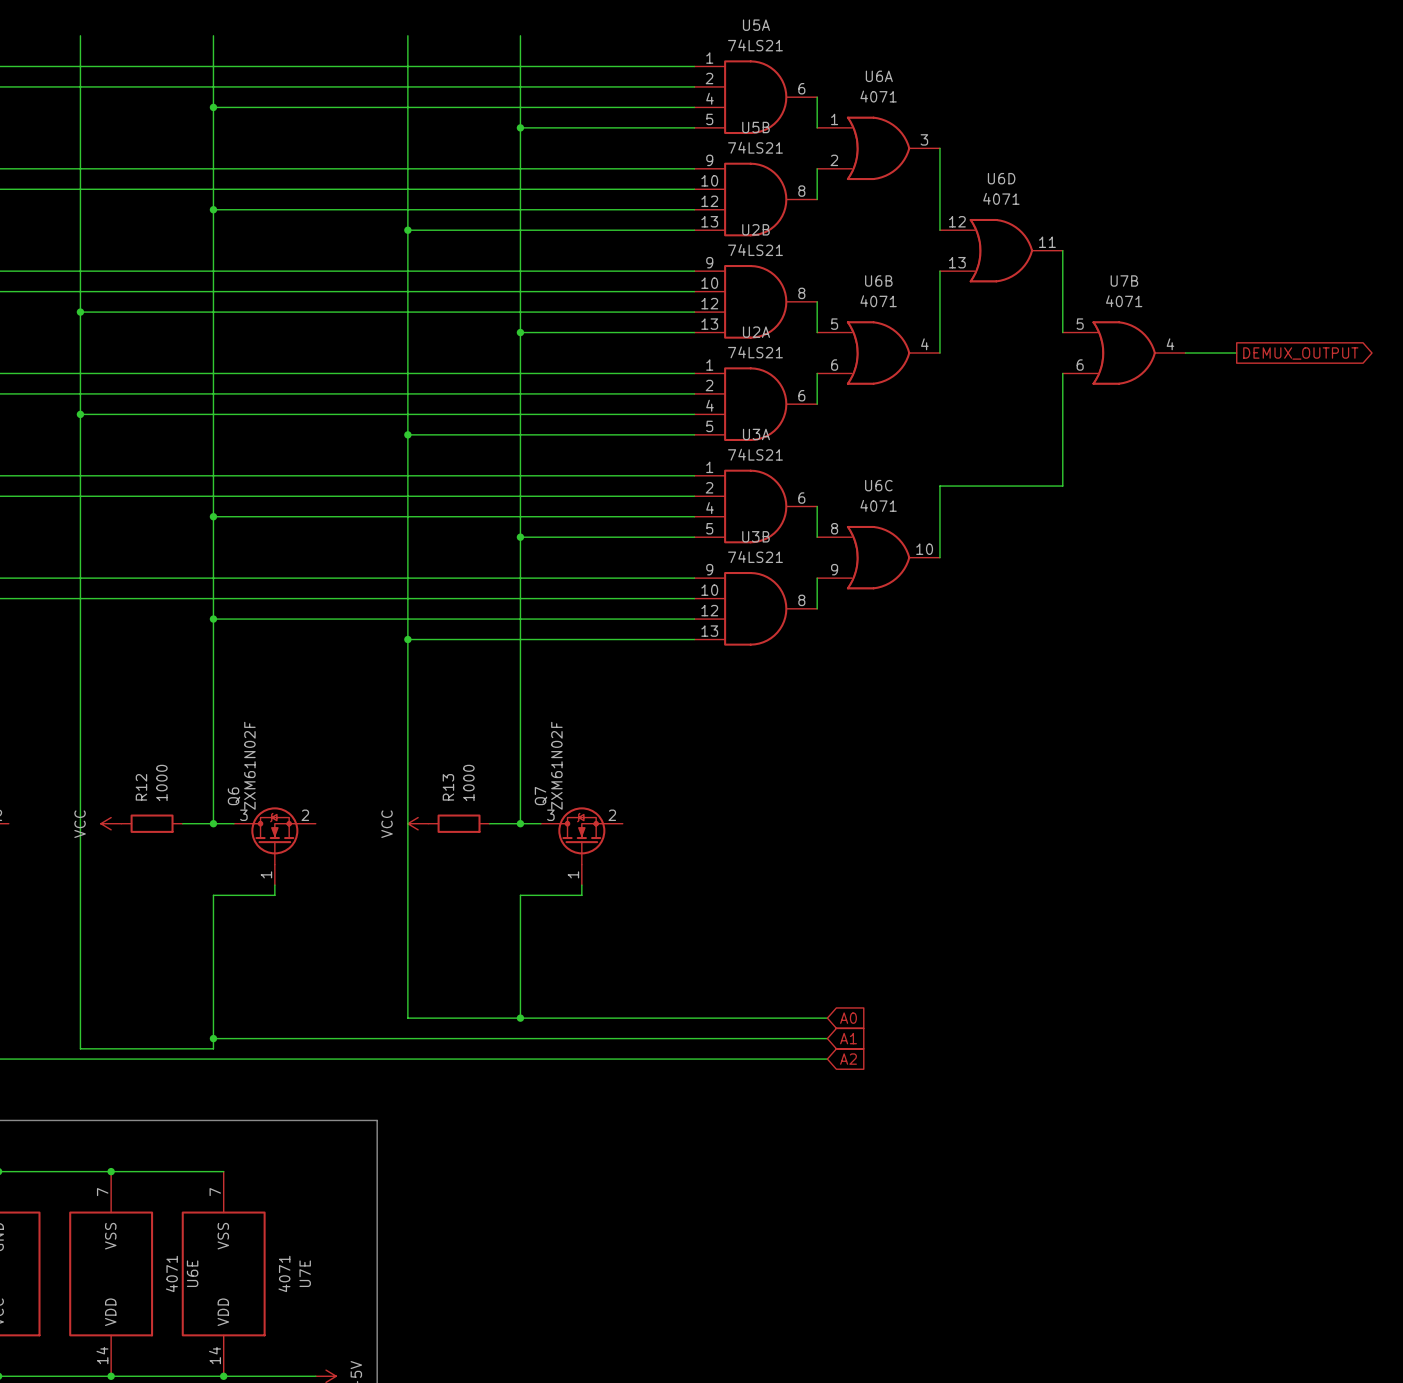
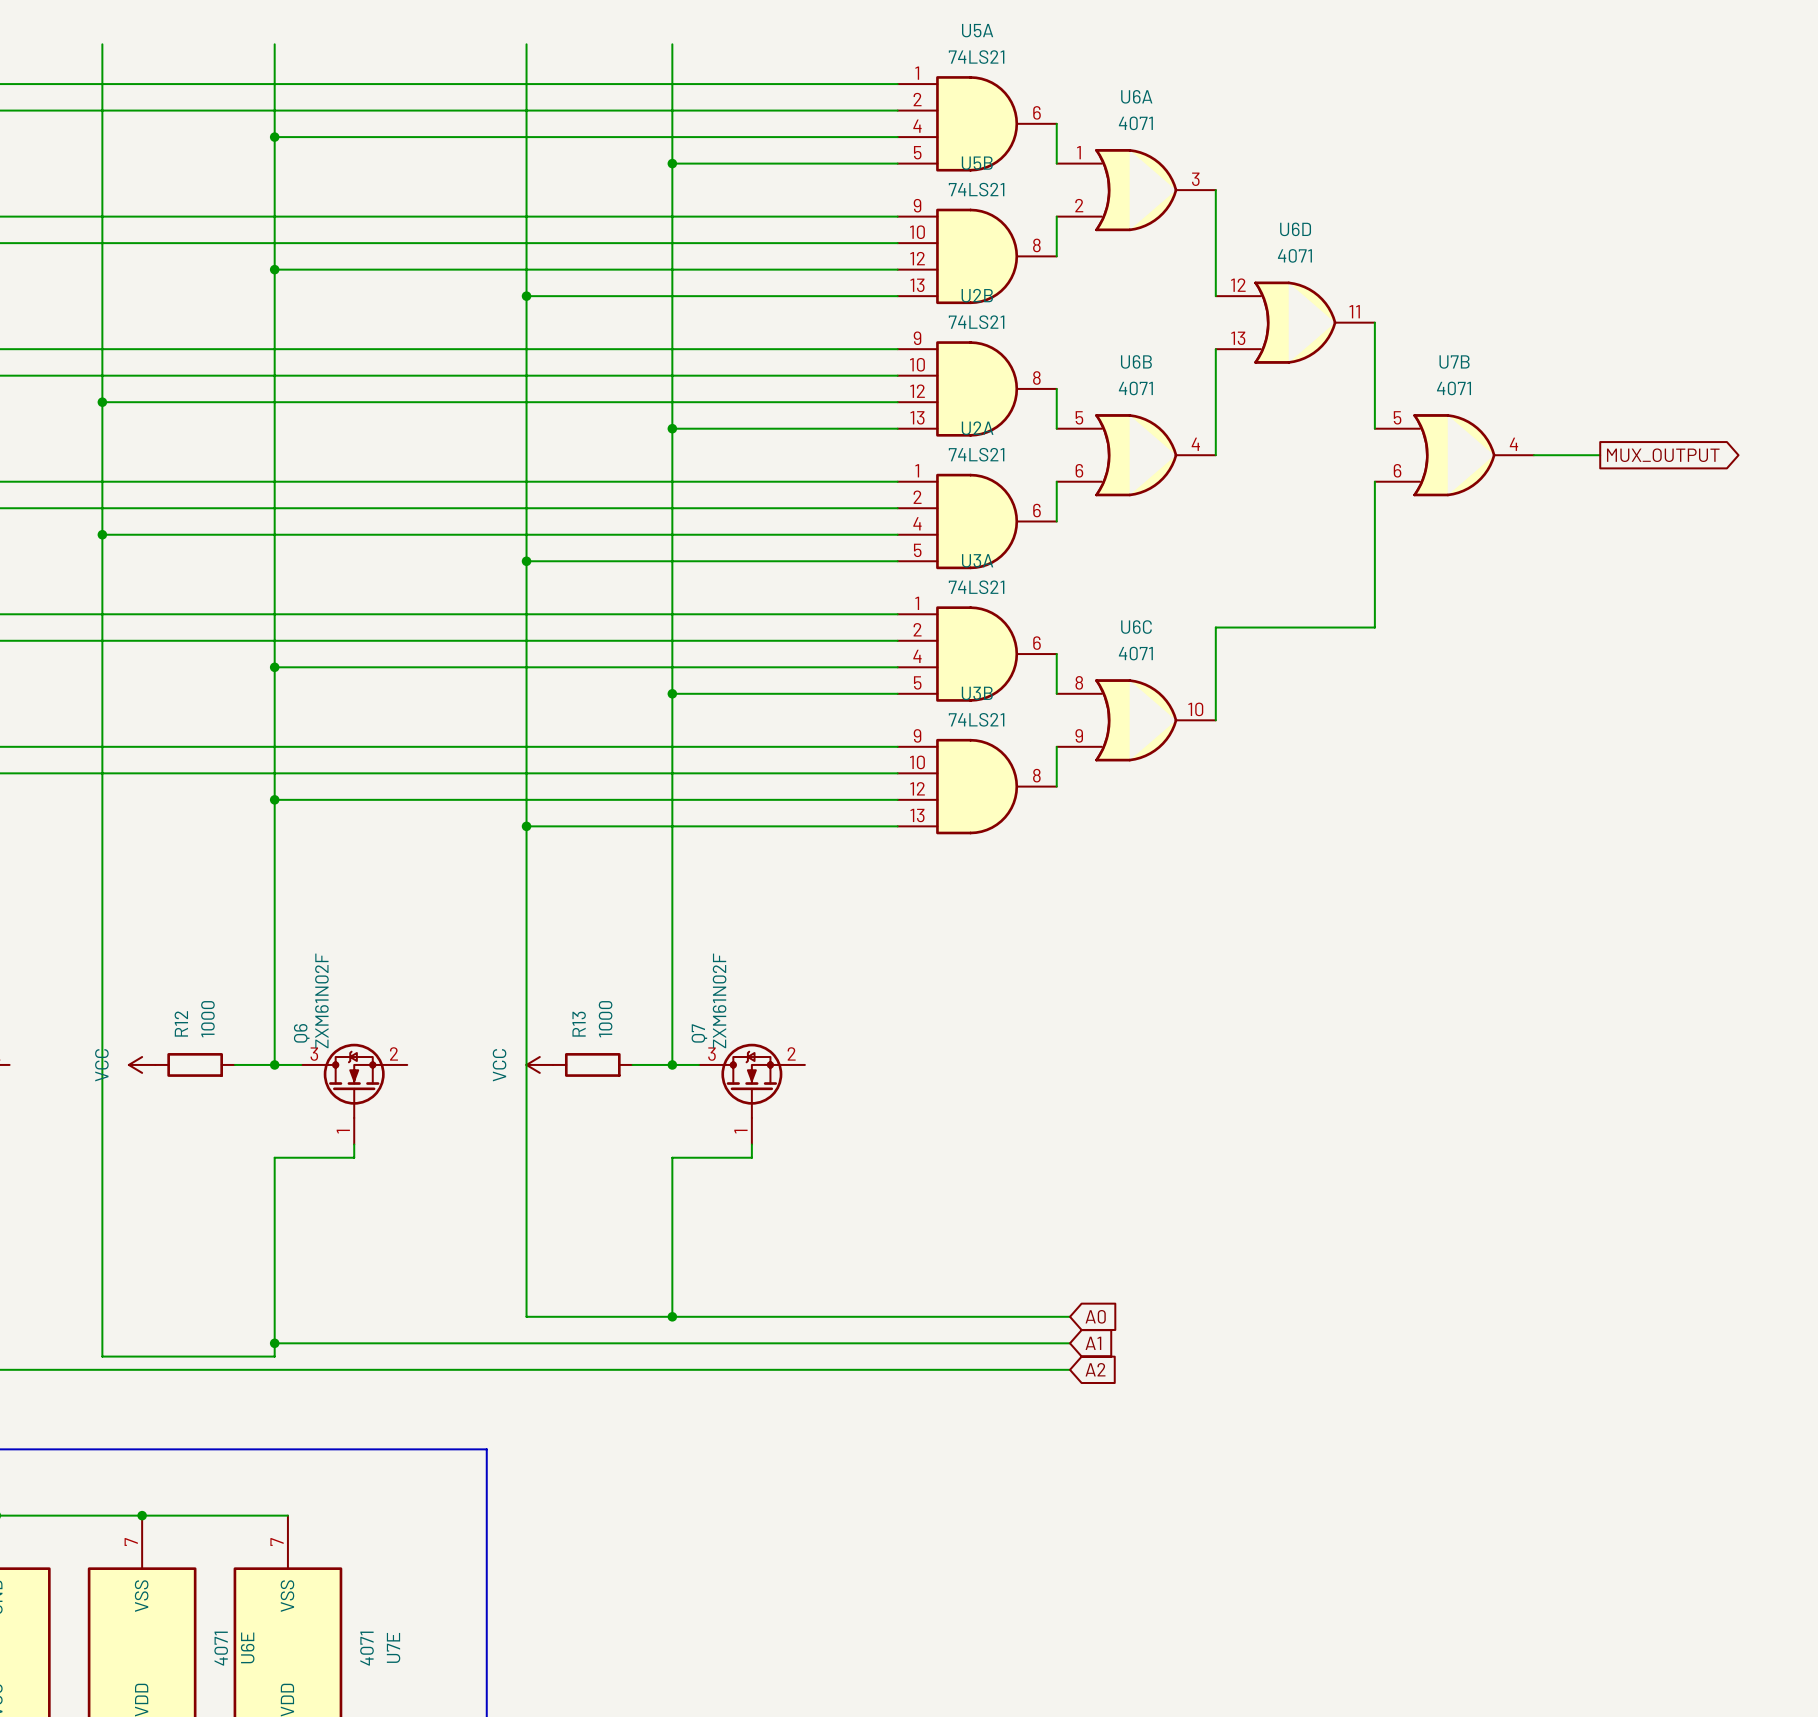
global label: DEMUX_OUTPUT (1300, 353) -> MUX_OUTPUT (1663, 455)

